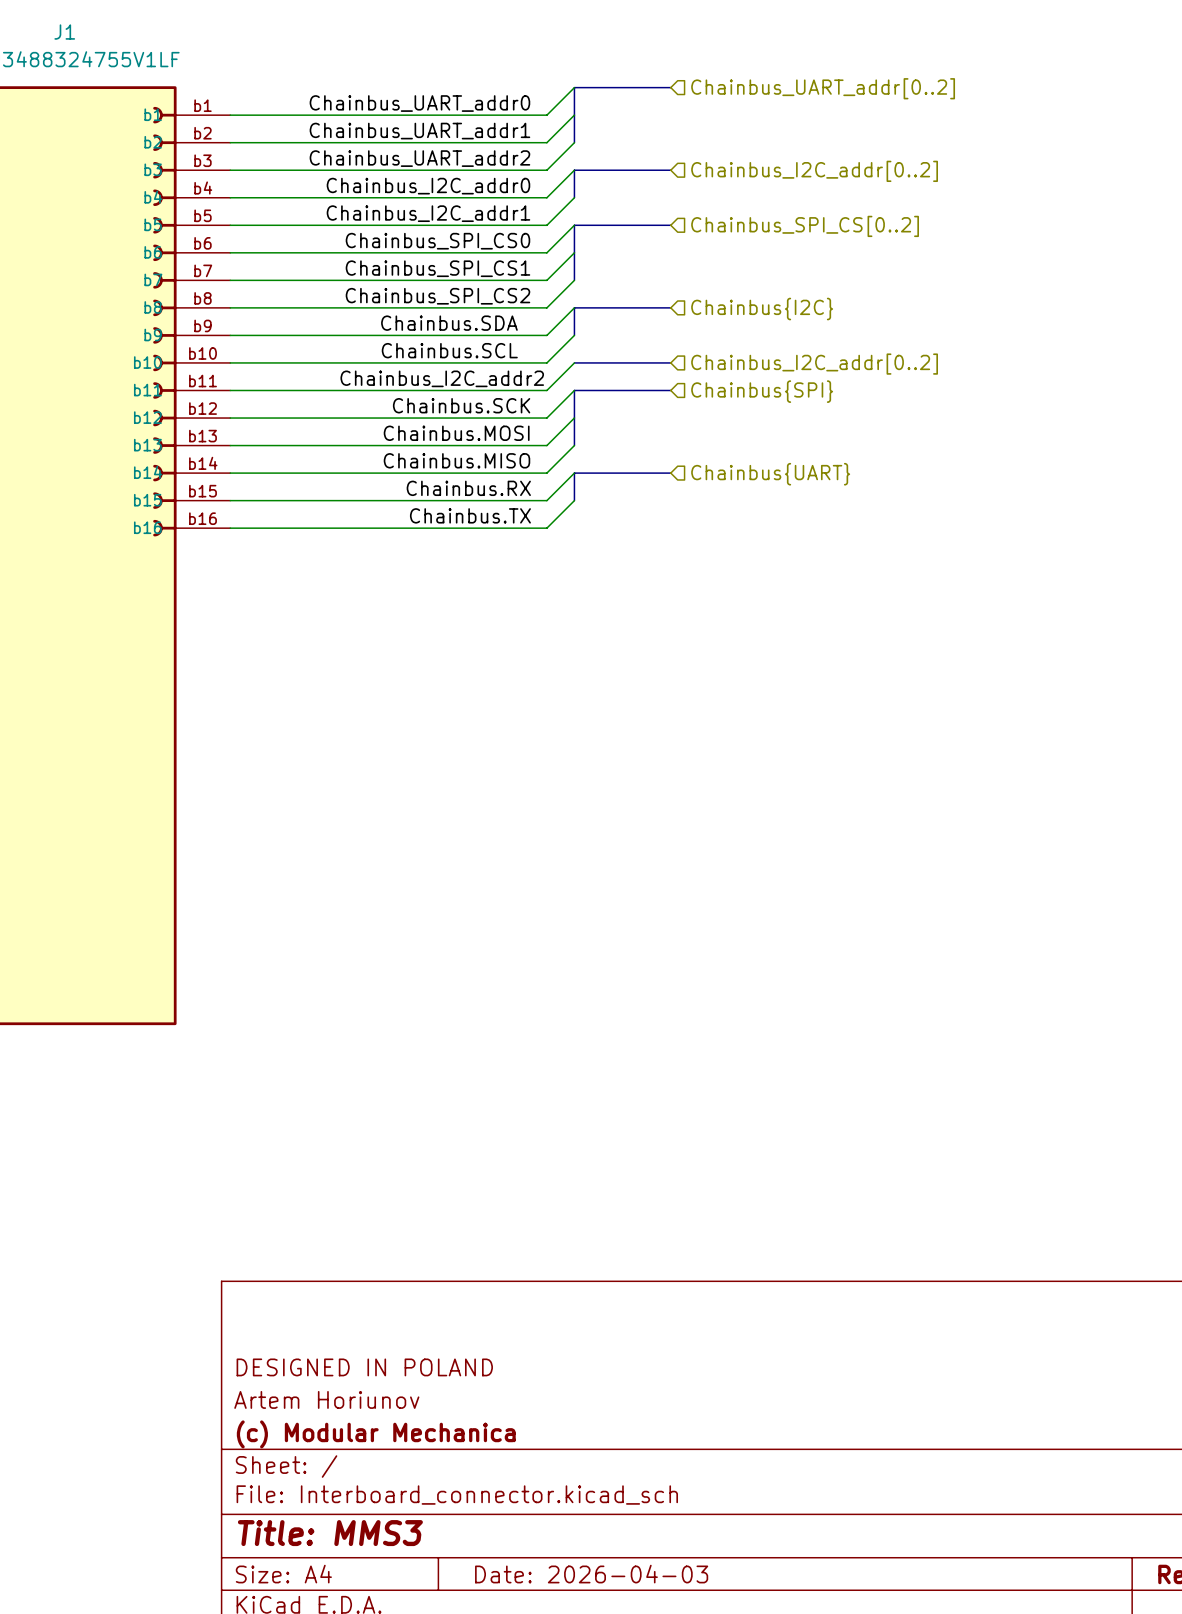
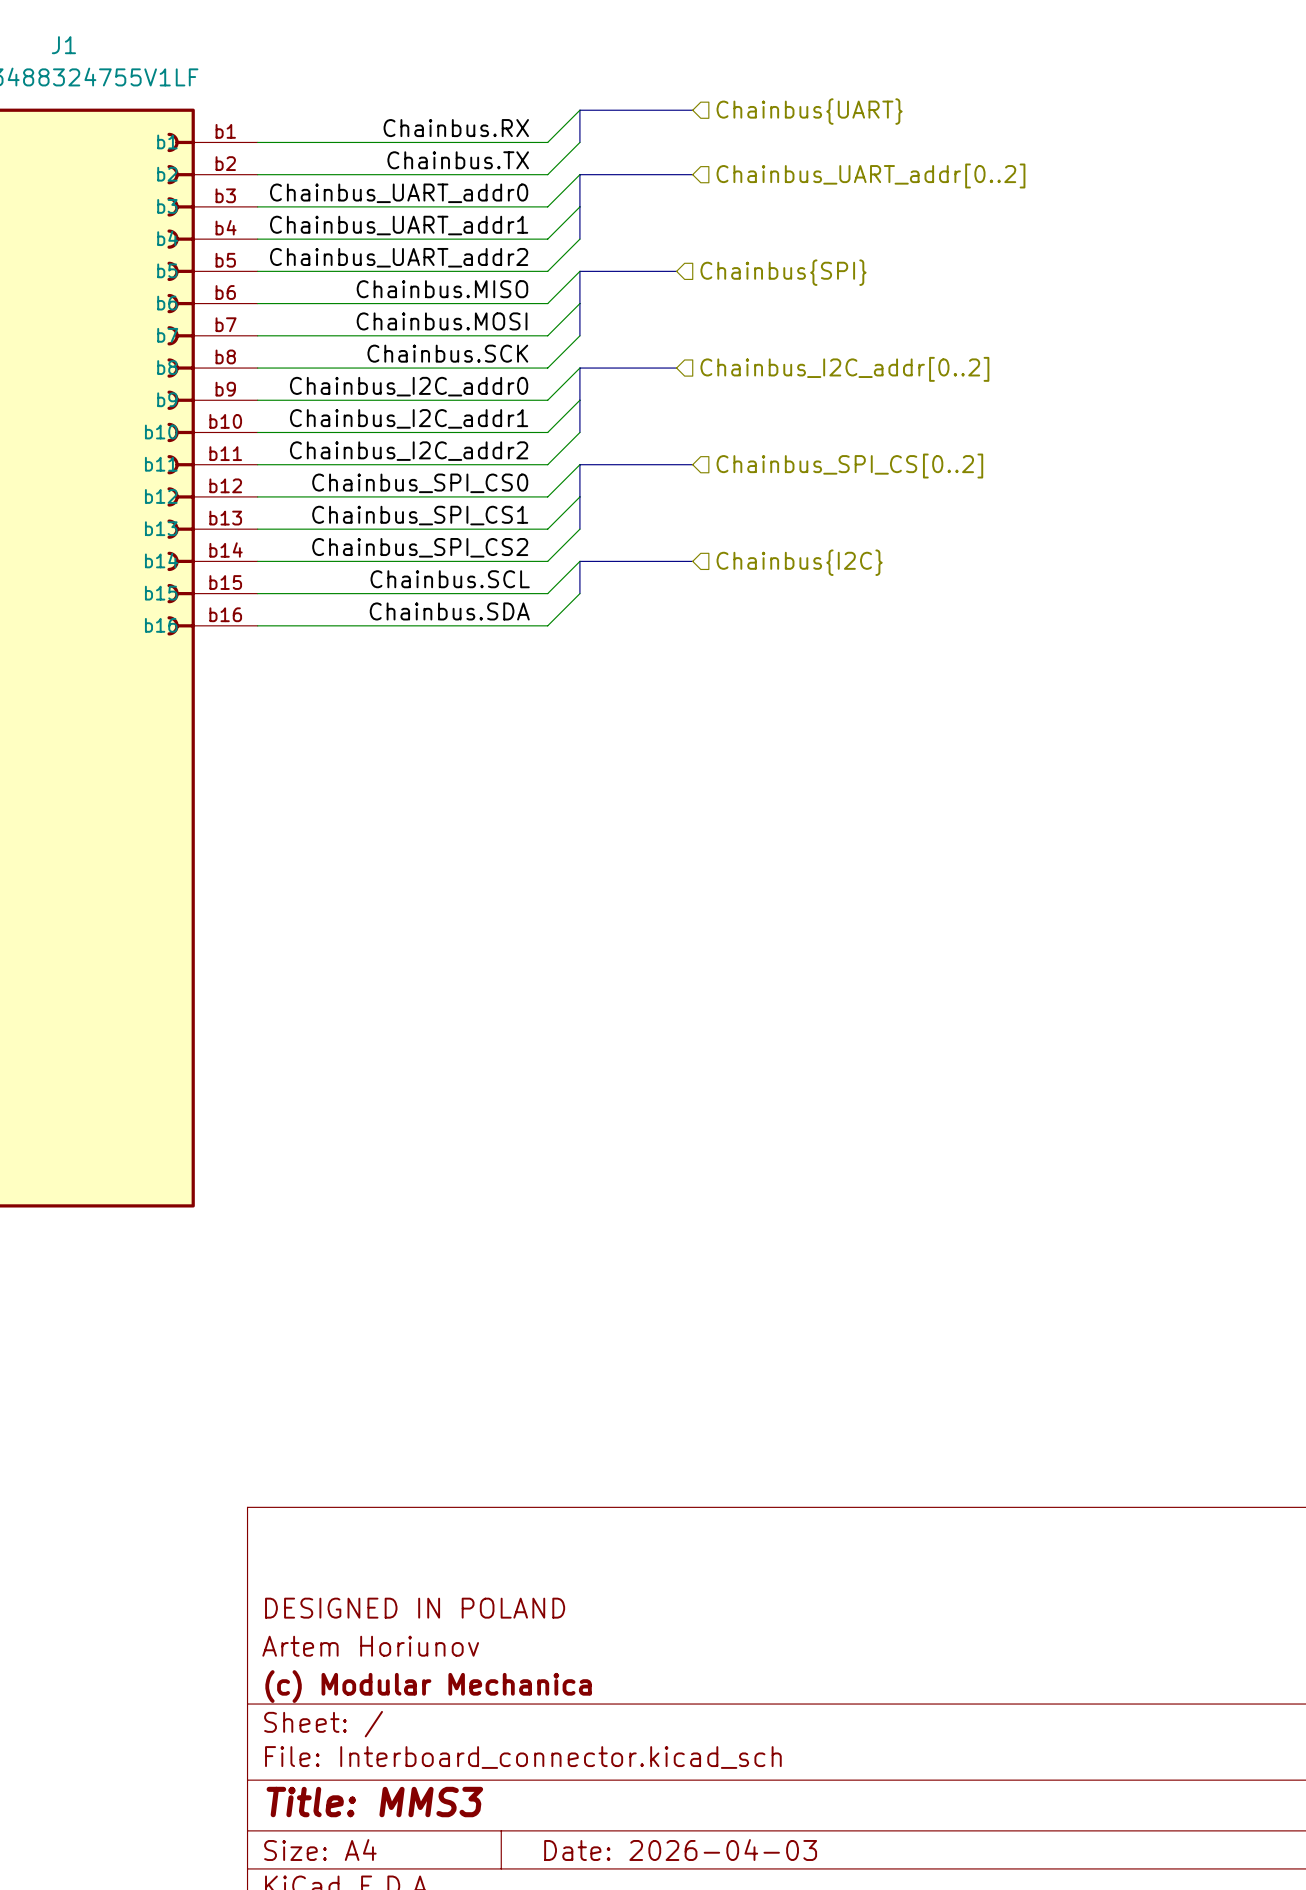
wire: (574, 87) (546, 115) (478, 115) -> (579, 110) (547, 142)
bus: (574, 87) (574, 142) -> (660, 110) (579, 110) (579, 142)
bus: (601, 87) (670, 87) -> none
hierarchical label: none -> Chainbus{UART} (809, 111)
hierarchical label position: Chainbus_UART_addr[0..2] (823, 88) -> Chainbus_UART_addr[0..2] (870, 175)
label: none -> Chainbus.RX (456, 128)
label position: Chainbus_UART_addr0 (419, 103) -> Chainbus_UART_addr0 (399, 193)
wire: (574, 115) (546, 142) (478, 142) -> (579, 142) (547, 174)
label: none -> Chainbus.TX (458, 160)
label position: Chainbus_UART_addr1 (419, 131) -> Chainbus_UART_addr1 (399, 225)
wire: (574, 142) (546, 170) (478, 170) -> (579, 174) (547, 206)
bus: none -> (692, 174) (579, 174) (579, 239)
label position: Chainbus_UART_addr2 (419, 158) -> Chainbus_UART_addr2 (399, 257)
wire: (574, 170) (546, 197) (478, 197) -> (579, 206) (547, 239)
bus: (670, 170) (574, 170) (574, 197) -> none
hierarchical label: Chainbus_I2C_addr[0..2] (814, 171) -> none
label position: Chainbus_I2C_addr0 (428, 186) -> Chainbus_I2C_addr0 (409, 386)
wire: (574, 197) (546, 225) (478, 225) -> (579, 239) (547, 271)
label position: Chainbus_I2C_addr1 (428, 213) -> Chainbus_I2C_addr1 (409, 418)
wire: (574, 225) (546, 252) (478, 252) -> (579, 271) (547, 303)
bus: (574, 225) (574, 280) -> (660, 271) (579, 271) (579, 335)
bus: (588, 225) (670, 225) -> none
hierarchical label position: Chainbus_SPI_CS[0..2] (805, 226) -> Chainbus_SPI_CS[0..2] (849, 466)
label position: Chainbus_SPI_CS0 (437, 241) -> Chainbus_SPI_CS0 (420, 483)
wire: (574, 252) (546, 280) (478, 280) -> (579, 303) (547, 335)
label position: Chainbus_SPI_CS1 (437, 268) -> Chainbus_SPI_CS1 (420, 515)
wire: (574, 280) (546, 307) (478, 307) -> (579, 335) (547, 368)
label position: Chainbus_SPI_CS2 (437, 296) -> Chainbus_SPI_CS2 (420, 547)
wire: (574, 307) (546, 335) (478, 335) -> (579, 368) (547, 400)
bus: (574, 307) (574, 335) -> (660, 368) (579, 368) (579, 432)
bus: (588, 307) (670, 307) -> none
hierarchical label: none -> Chainbus_I2C_addr[0..2] (844, 369)
hierarchical label position: Chainbus{I2C} (762, 309) -> Chainbus{I2C} (799, 562)
label position: Chainbus.SDA (449, 323) -> Chainbus.SDA (449, 611)
wire: (574, 335) (546, 362) (478, 362) -> (579, 400) (547, 432)
label position: Chainbus.SCL (449, 350) -> Chainbus.SCL (450, 579)
wire: (574, 362) (546, 390) (478, 390) -> (579, 432) (547, 464)
bus: (574, 362) (670, 362) -> none
hierarchical label: Chainbus_I2C_addr[0..2] (814, 364) -> none
label position: Chainbus_I2C_addr2 (442, 378) -> Chainbus_I2C_addr2 (409, 451)
wire: (574, 390) (546, 418) (478, 418) -> (579, 464) (547, 496)
bus: (574, 390) (574, 445) -> (660, 464) (579, 464) (579, 529)
bus: (601, 390) (670, 390) -> none
hierarchical label position: Chainbus{SPI} (762, 391) -> Chainbus{SPI} (783, 272)
label position: Chainbus.SCK (461, 405) -> Chainbus.SCK (447, 353)
wire: (574, 418) (546, 445) (478, 445) -> (579, 496) (547, 529)
label position: Chainbus.MOSI (456, 433) -> Chainbus.MOSI (442, 321)
wire: (574, 445) (546, 473) (478, 473) -> (579, 529) (547, 561)
label position: Chainbus.MISO (456, 460) -> Chainbus.MISO (442, 289)
wire: (574, 473) (546, 500) (478, 500) -> (579, 561) (547, 593)
bus: (574, 473) (574, 500) -> (660, 561) (579, 561) (579, 593)
bus: (601, 473) (670, 473) -> none
hierarchical label: Chainbus{UART} (770, 474) -> none
label: Chainbus.RX (468, 488) -> none
wire: (574, 500) (546, 528) (478, 528) -> (579, 593) (547, 625)
label: Chainbus.TX (470, 515) -> none

